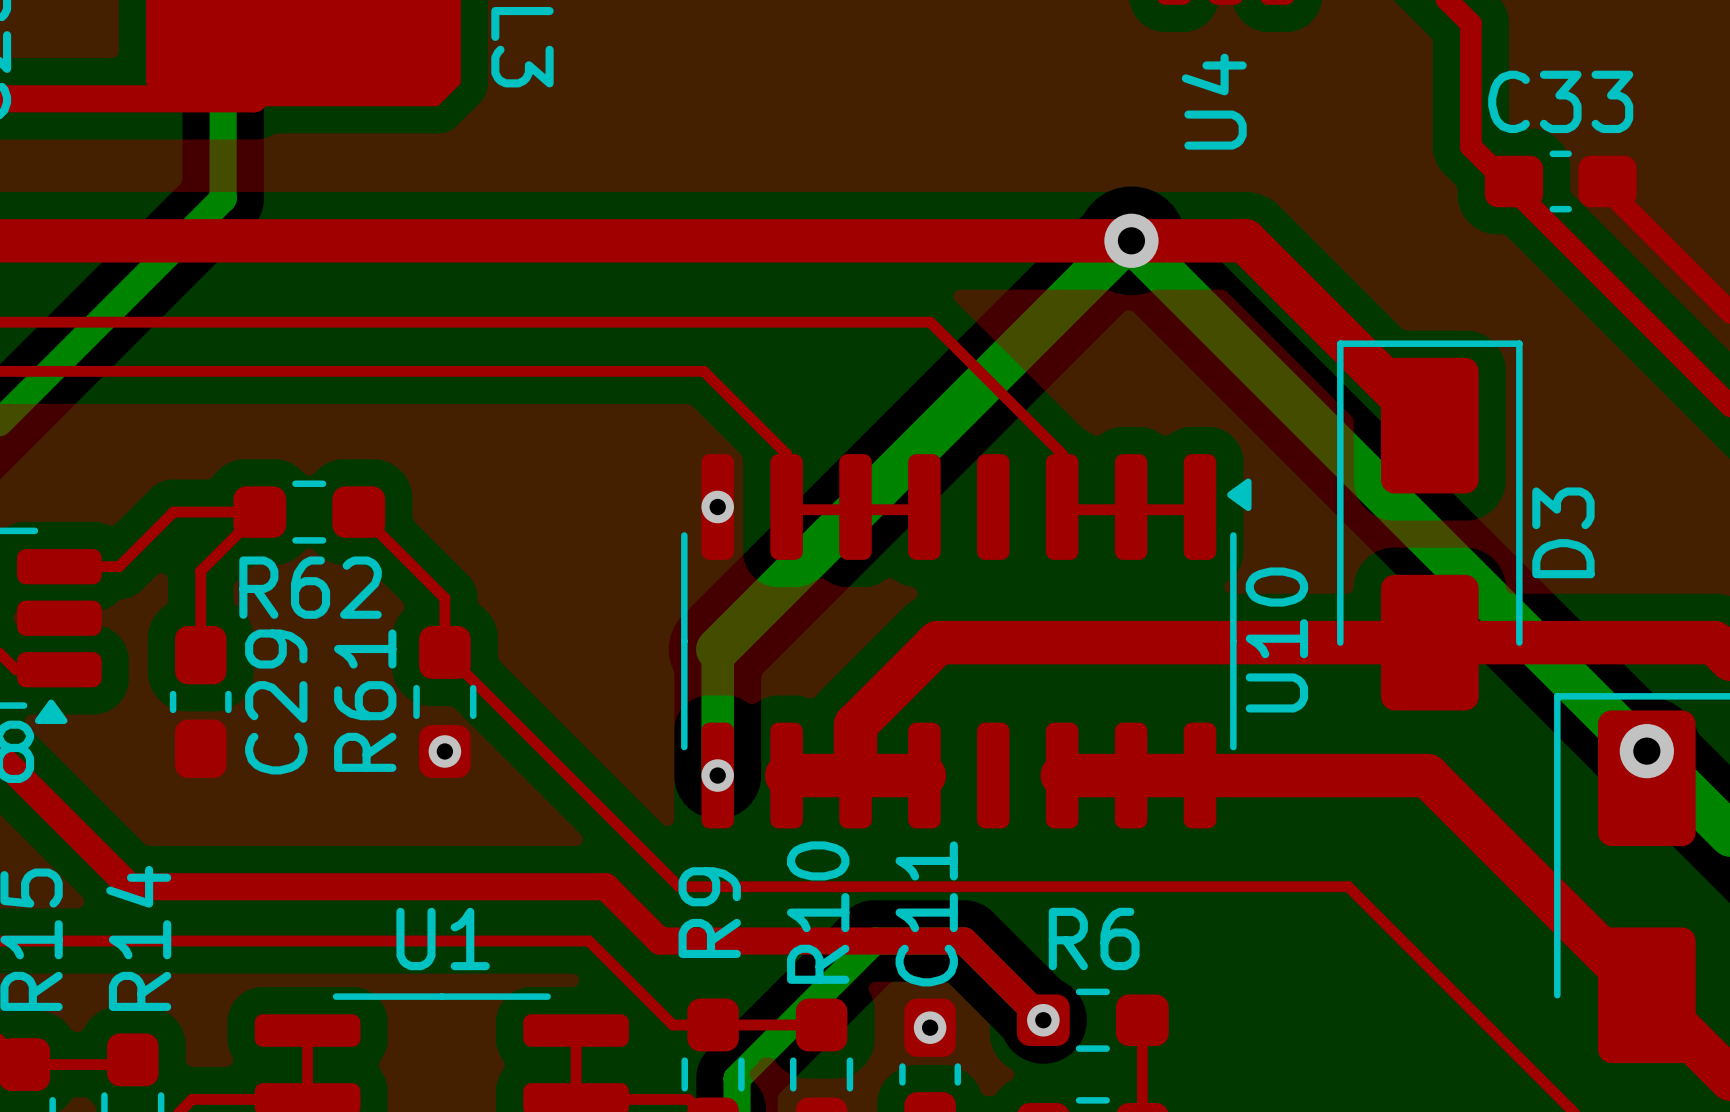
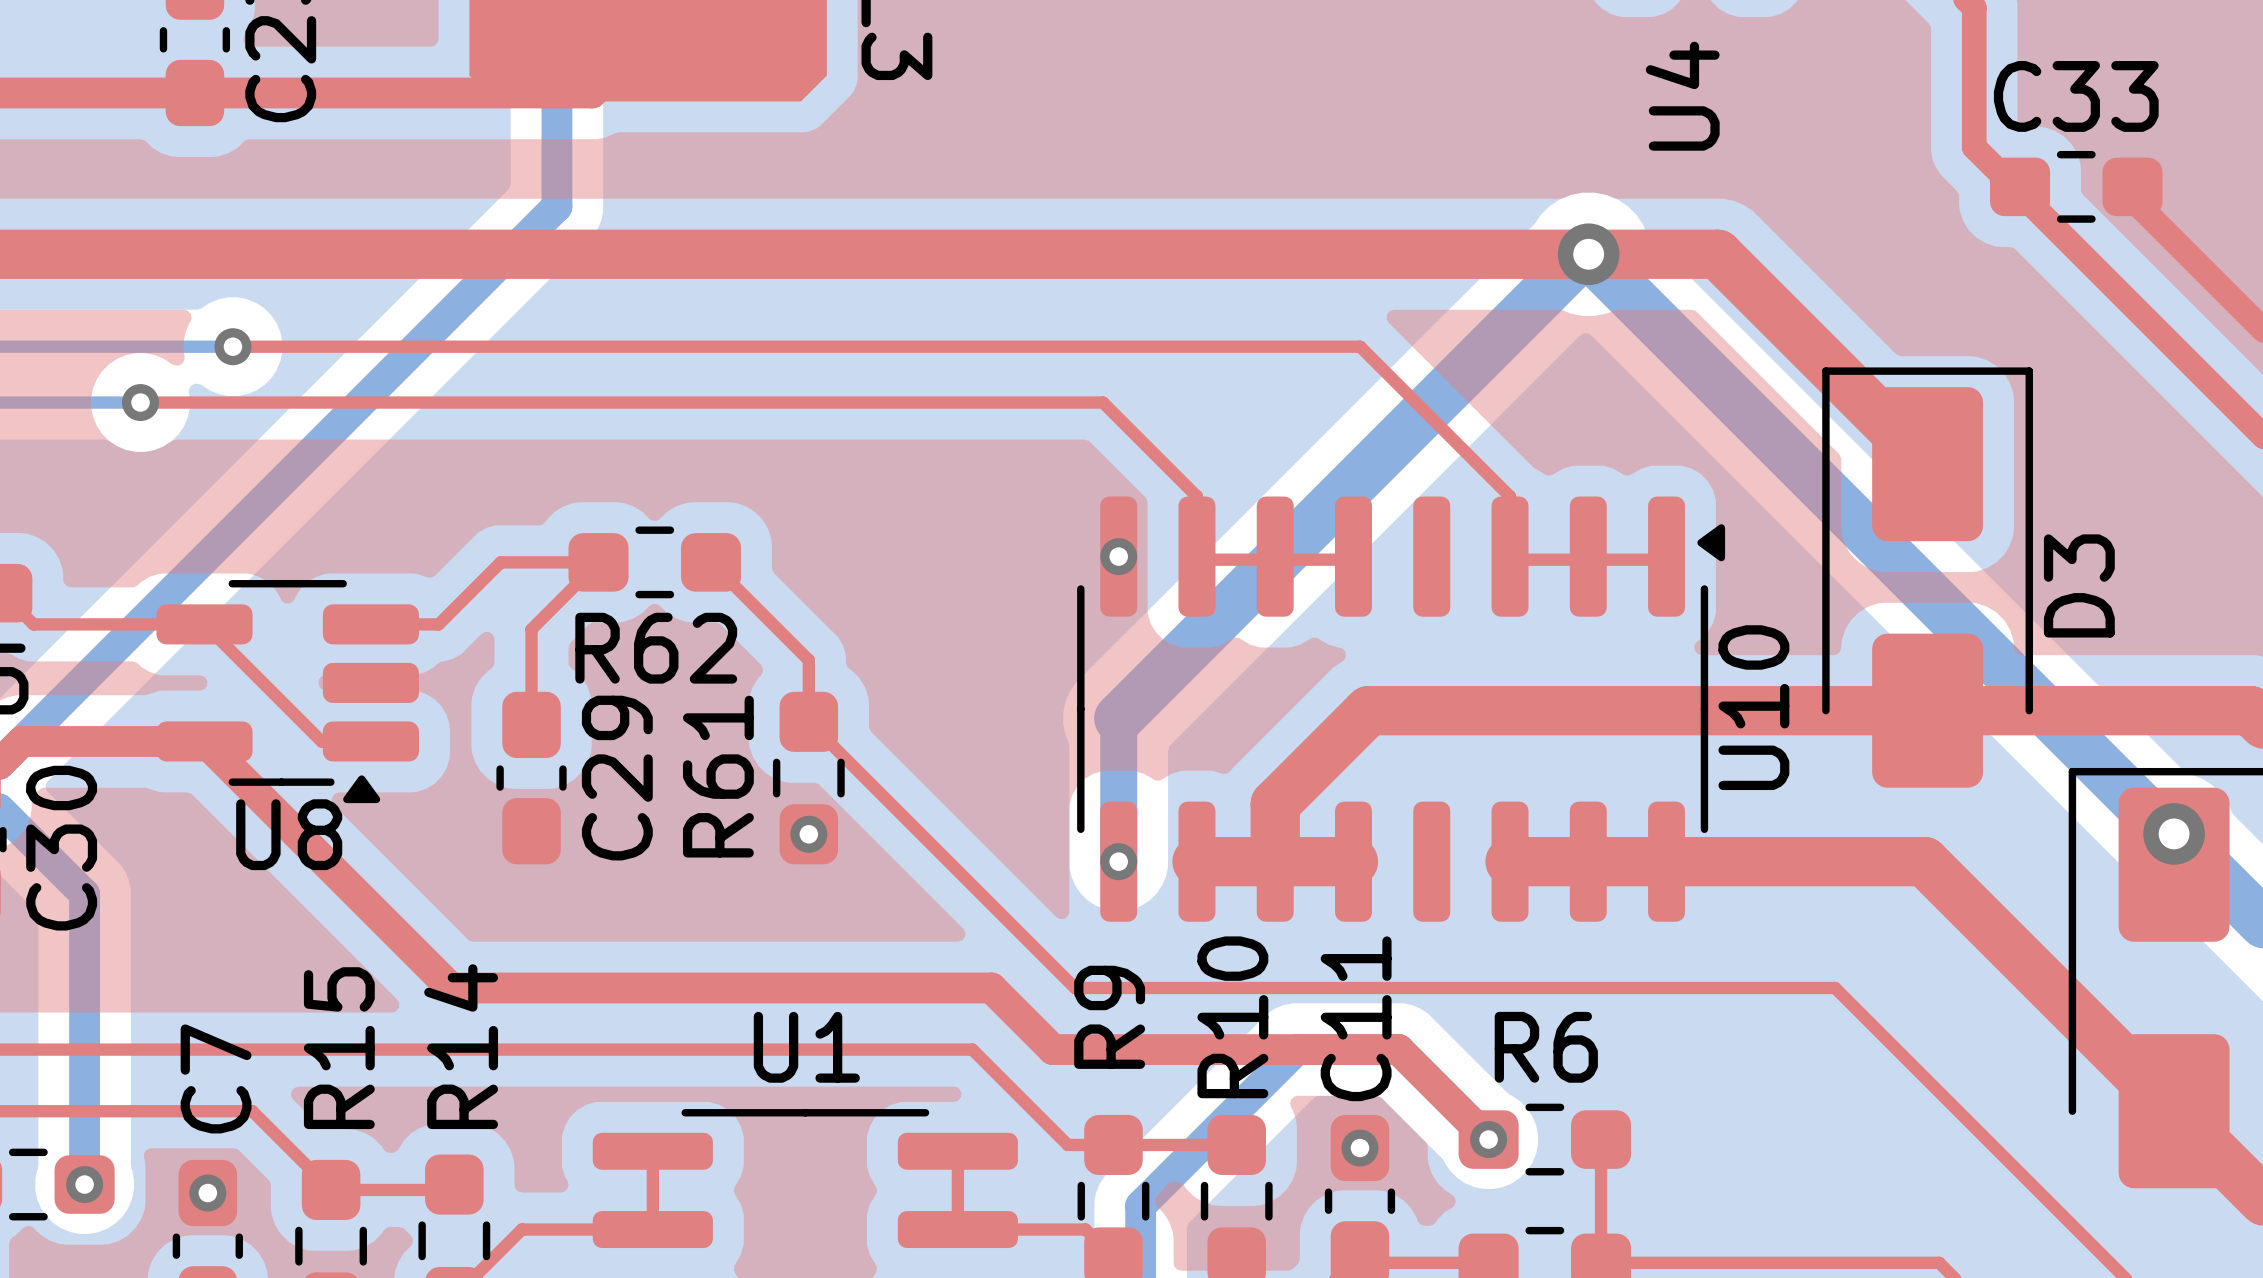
C33 footprint: [1484, 150, 1637, 213] -> [1989, 150, 2163, 223]

